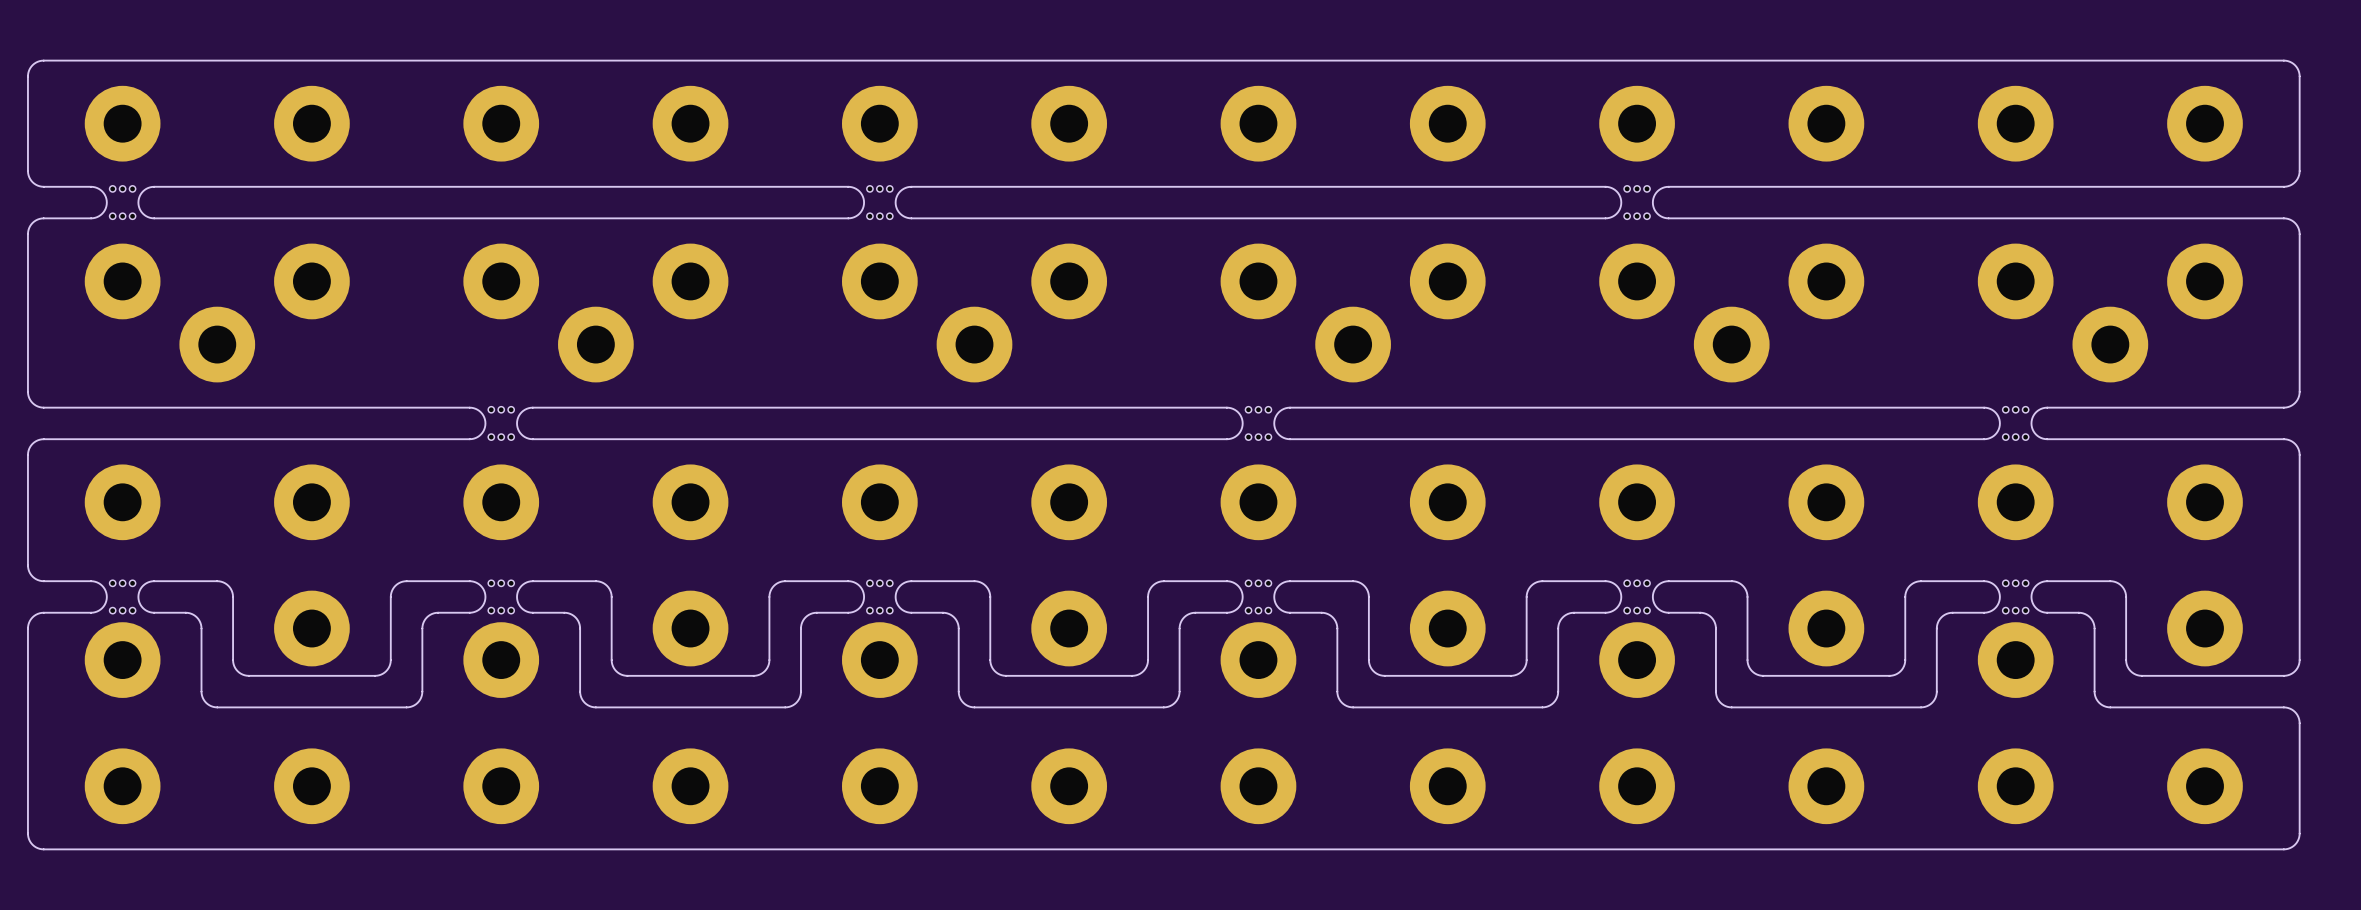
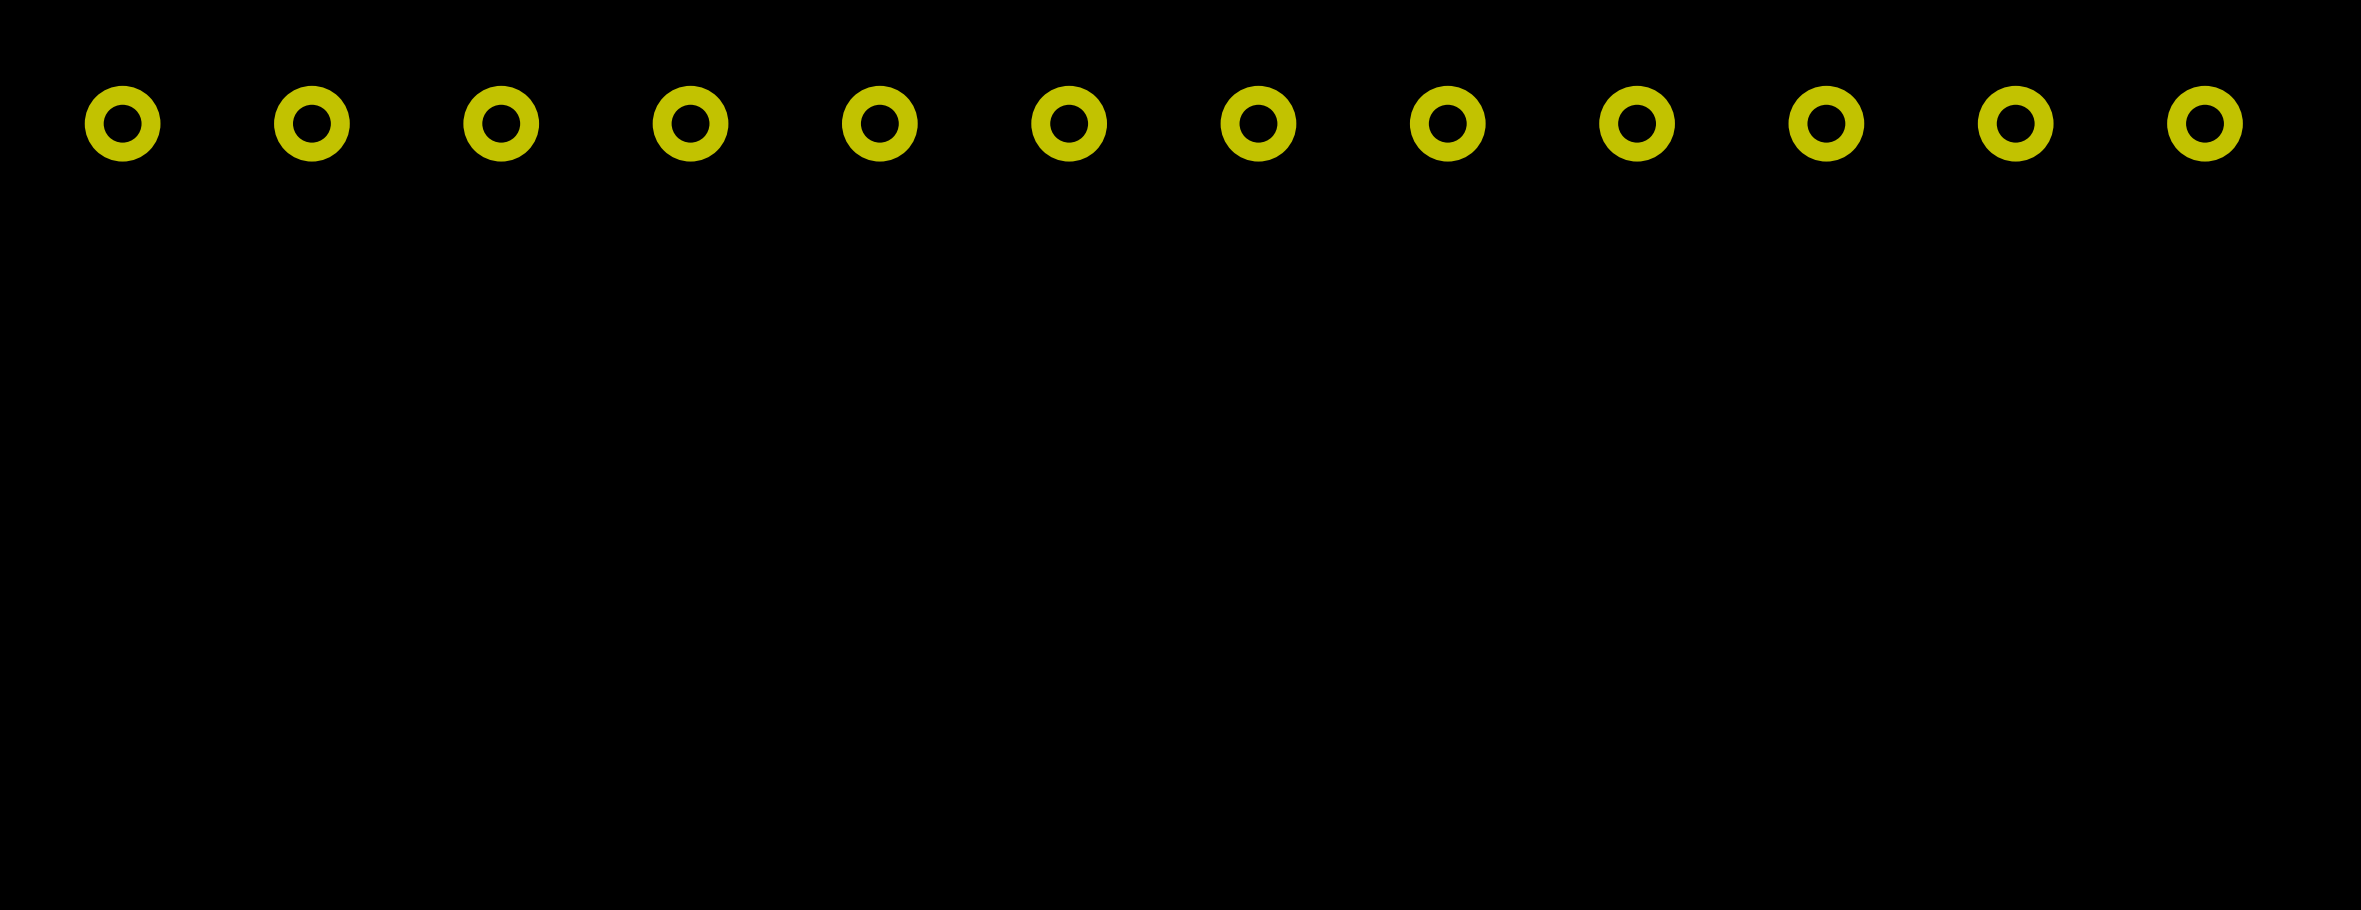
board edge: (2283, 60) (37, 61) (31, 66) (28, 74) (29, 177) (34, 183) (41, 186) (95, 187) (103, 192) (106, 202) (103, 212) (95, 217) (41, 218) (34, 221) (29, 228) (27, 391) (30, 399) (34, 404) (43, 407) (469, 407) (480, 412) (485, 423) (480, 434) (469, 439) (43, 439) (32, 443) (27, 454) (29, 571) (34, 577) (41, 581) (95, 581) (103, 587) (106, 596) (104, 604) (97, 611) (41, 612) (34, 616) (28, 624) (29, 839) (35, 847) (43, 849) (2289, 848) (2297, 841) (2299, 833) (2299, 723) (2295, 712) (2283, 707) (2104, 706) (2097, 701) (2094, 693) (2094, 628) (2092, 620) (2086, 614) (2080, 612) (2041, 611) (2033, 604) (2031, 596) (2034, 587) (2045, 581) (2110, 581) (2119, 584) (2125, 594) (2126, 662) (2129, 669) (2137, 675) (2283, 675) (2291, 673) (2297, 667) (2299, 660) (2299, 454) (2297, 447) (2291, 441) (2283, 439) (2045, 439) (2034, 433) (2031, 423) (2034, 413) (2045, 407) (2283, 407) (2293, 404) (2297, 399) (2299, 391) (2299, 234) (2295, 222) (2283, 218) (1668, 218) (1657, 213) (1652, 202) (1657, 191) (1668, 186) (2287, 186) (2296, 180) (2299, 173) (2299, 76) (2295, 65) (2283, 60) -> none
board edge: (848, 186) (154, 186) (143, 191) (138, 202) (143, 213) (154, 218) (848, 218) (859, 213) (864, 202) (859, 191) (848, 186) -> none
board edge: (1605, 186) (911, 186) (900, 191) (895, 202) (900, 213) (911, 218) (1605, 218) (1616, 213) (1621, 202) (1616, 191) (1605, 186) -> none
part: (122, 202) -> none
part: (879, 202) -> none
part: (1637, 202) -> none
part: (122, 281) -> none
part: (311, 281) -> none
part: (501, 281) -> none
part: (690, 281) -> none
part: (879, 281) -> none
part: (1069, 281) -> none
part: (1258, 281) -> none
part: (1447, 281) -> none
part: (1637, 281) -> none
part: (1826, 281) -> none
part: (2015, 281) -> none
part: (2205, 281) -> none
part: (217, 344) -> none
part: (595, 344) -> none
part: (974, 344) -> none
part: (1353, 344) -> none
part: (1731, 344) -> none
part: (2110, 344) -> none
board edge: (1226, 407) (532, 407) (521, 412) (517, 423) (521, 434) (532, 439) (1226, 439) (1238, 434) (1242, 423) (1238, 412) (1226, 407) -> none
board edge: (1984, 407) (1290, 407) (1278, 412) (1274, 423) (1278, 434) (1290, 439) (1984, 439) (1995, 434) (1999, 423) (1995, 412) (1984, 407) -> none
part: (501, 423) -> none
part: (1258, 423) -> none
part: (2015, 423) -> none
part: (122, 502) -> none
part: (311, 502) -> none
part: (501, 502) -> none
part: (690, 502) -> none
part: (879, 502) -> none
part: (1069, 502) -> none
part: (1258, 502) -> none
part: (1447, 502) -> none
part: (1637, 502) -> none
part: (1826, 502) -> none
part: (2015, 502) -> none
part: (2205, 502) -> none
board edge: (469, 581) (406, 581) (395, 585) (390, 594) (390, 664) (384, 672) (375, 675) (248, 675) (240, 673) (235, 667) (233, 662) (232, 592) (228, 585) (221, 581) (152, 581) (141, 587) (138, 596) (140, 604) (148, 611) (187, 612) (193, 614) (199, 620) (201, 628) (201, 693) (204, 701) (211, 706) (406, 707) (416, 704) (421, 695) (422, 628) (424, 620) (434, 613) (471, 612) (479, 609) (484, 601) (484, 592) (479, 584) (469, 581) -> none
board edge: (848, 581) (785, 581) (774, 585) (769, 594) (768, 664) (763, 672) (753, 675) (627, 675) (619, 673) (613, 667) (611, 662) (611, 592) (607, 585) (599, 581) (530, 581) (520, 587) (517, 596) (519, 604) (526, 611) (566, 612) (572, 614) (578, 620) (580, 628) (580, 693) (583, 701) (589, 706) (785, 707) (794, 704) (800, 695) (800, 628) (804, 618) (814, 612) (852, 612) (861, 604) (864, 596) (861, 589) (856, 583) (848, 581) -> none
board edge: (1226, 581) (1163, 581) (1152, 585) (1148, 594) (1147, 664) (1141, 672) (1132, 675) (1006, 675) (998, 673) (992, 667) (990, 662) (989, 592) (985, 585) (978, 581) (909, 581) (898, 587) (895, 596) (897, 604) (905, 611) (945, 612) (950, 614) (956, 620) (958, 628) (958, 693) (961, 701) (968, 706) (1163, 707) (1173, 704) (1179, 695) (1179, 628) (1181, 620) (1191, 613) (1228, 612) (1236, 609) (1242, 601) (1242, 592) (1236, 584) (1226, 581) -> none
board edge: (1605, 581) (1542, 581) (1531, 585) (1526, 594) (1526, 664) (1520, 672) (1510, 675) (1384, 675) (1376, 673) (1371, 667) (1369, 662) (1368, 592) (1364, 585) (1357, 581) (1287, 581) (1277, 587) (1274, 596) (1276, 604) (1283, 611) (1323, 612) (1329, 614) (1335, 620) (1337, 628) (1337, 693) (1340, 701) (1347, 706) (1542, 707) (1552, 704) (1557, 695) (1558, 628) (1561, 618) (1571, 612) (1609, 612) (1619, 604) (1621, 596) (1619, 589) (1613, 583) (1605, 581) -> none
board edge: (1984, 581) (1921, 581) (1909, 585) (1905, 594) (1904, 664) (1899, 672) (1889, 675) (1763, 675) (1755, 673) (1749, 667) (1747, 662) (1746, 592) (1742, 585) (1735, 581) (1666, 581) (1656, 587) (1652, 596) (1654, 604) (1662, 611) (1702, 612) (1708, 614) (1713, 620) (1715, 628) (1716, 693) (1719, 701) (1725, 706) (1921, 707) (1930, 704) (1936, 695) (1936, 628) (1940, 618) (1950, 612) (1988, 612) (1997, 604) (1999, 596) (1997, 589) (1992, 583) (1984, 581) -> none
part: (122, 596) -> none
part: (501, 596) -> none
part: (879, 596) -> none
part: (1258, 596) -> none
part: (1637, 596) -> none
part: (2015, 596) -> none
part: (311, 628) -> none
part: (690, 628) -> none
part: (1069, 628) -> none
part: (1447, 628) -> none
part: (1826, 628) -> none
part: (2205, 628) -> none
part: (122, 660) -> none
part: (501, 660) -> none
part: (879, 660) -> none
part: (1258, 660) -> none
part: (1637, 660) -> none
part: (2015, 660) -> none
part: (122, 786) -> none
part: (311, 786) -> none
part: (501, 786) -> none
part: (690, 786) -> none
part: (879, 786) -> none
part: (1069, 786) -> none
part: (1258, 786) -> none
part: (1447, 786) -> none
part: (1637, 786) -> none
part: (1826, 786) -> none
part: (2015, 786) -> none
part: (2205, 786) -> none

